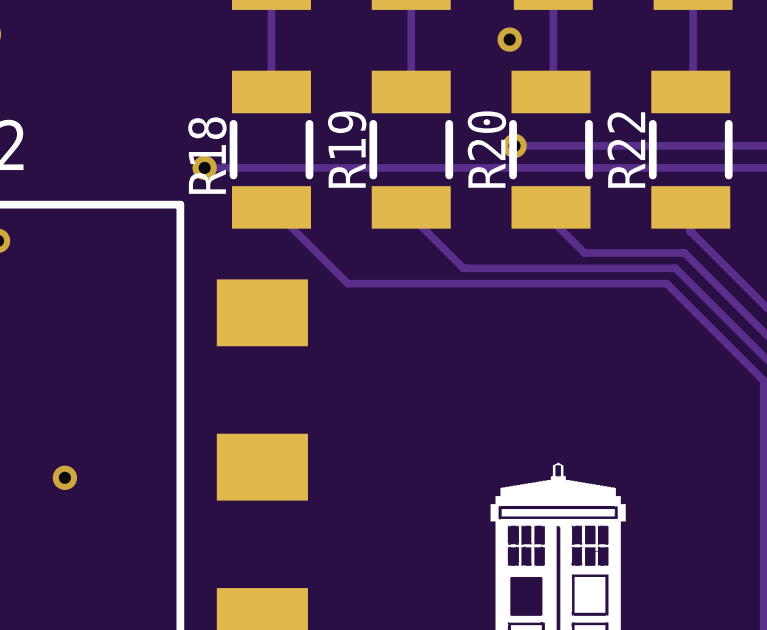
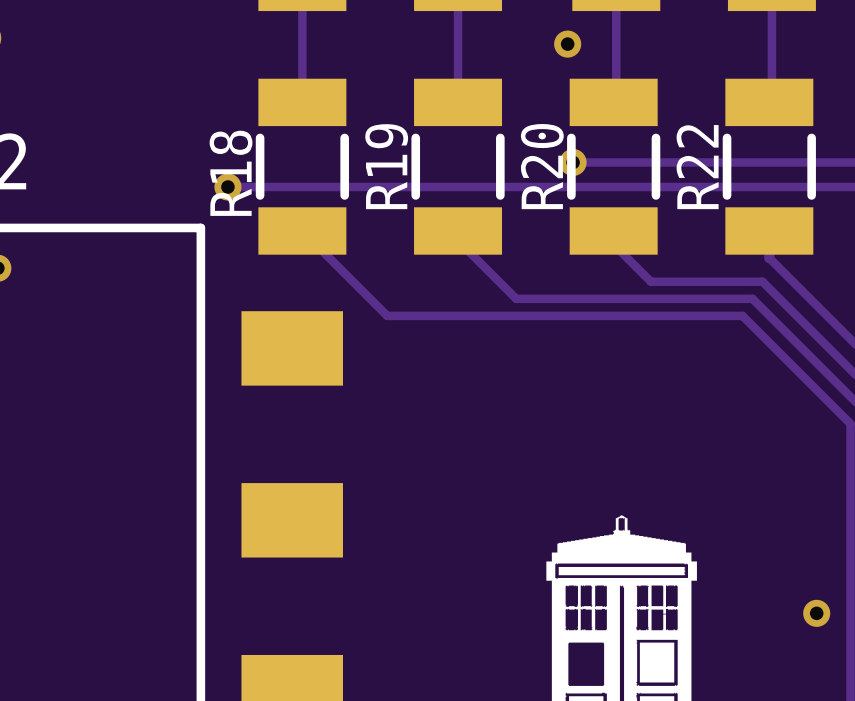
via: (64, 477) -> none
via: none -> (816, 613)

